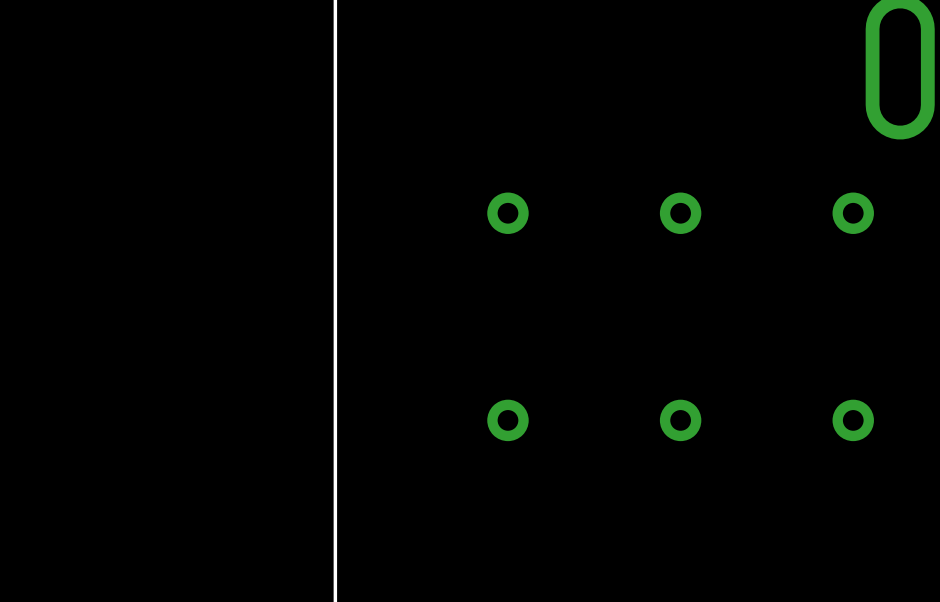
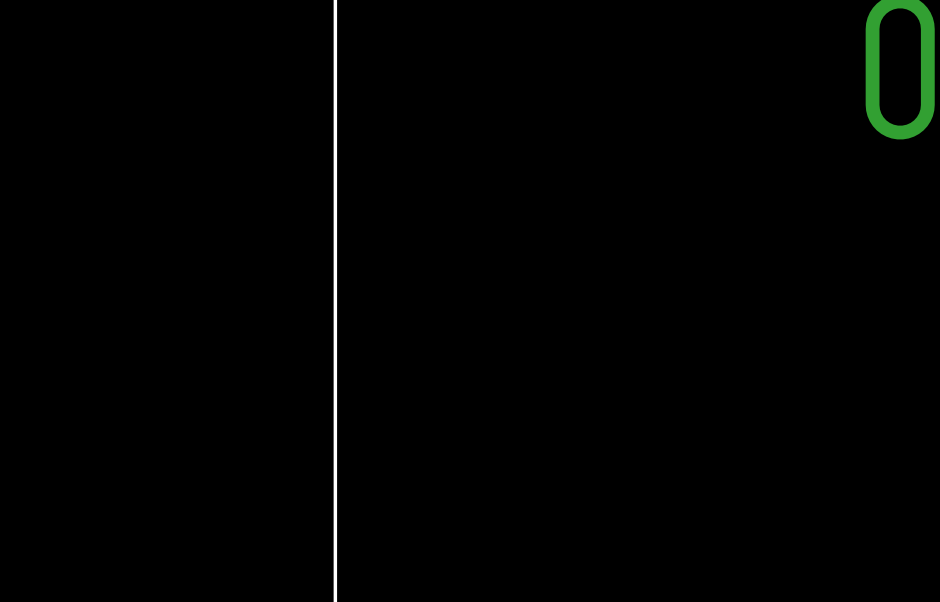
via: (507, 213) -> none
via: (680, 213) -> none
via: (853, 213) -> none
via: (507, 420) -> none
via: (680, 420) -> none
via: (853, 420) -> none

